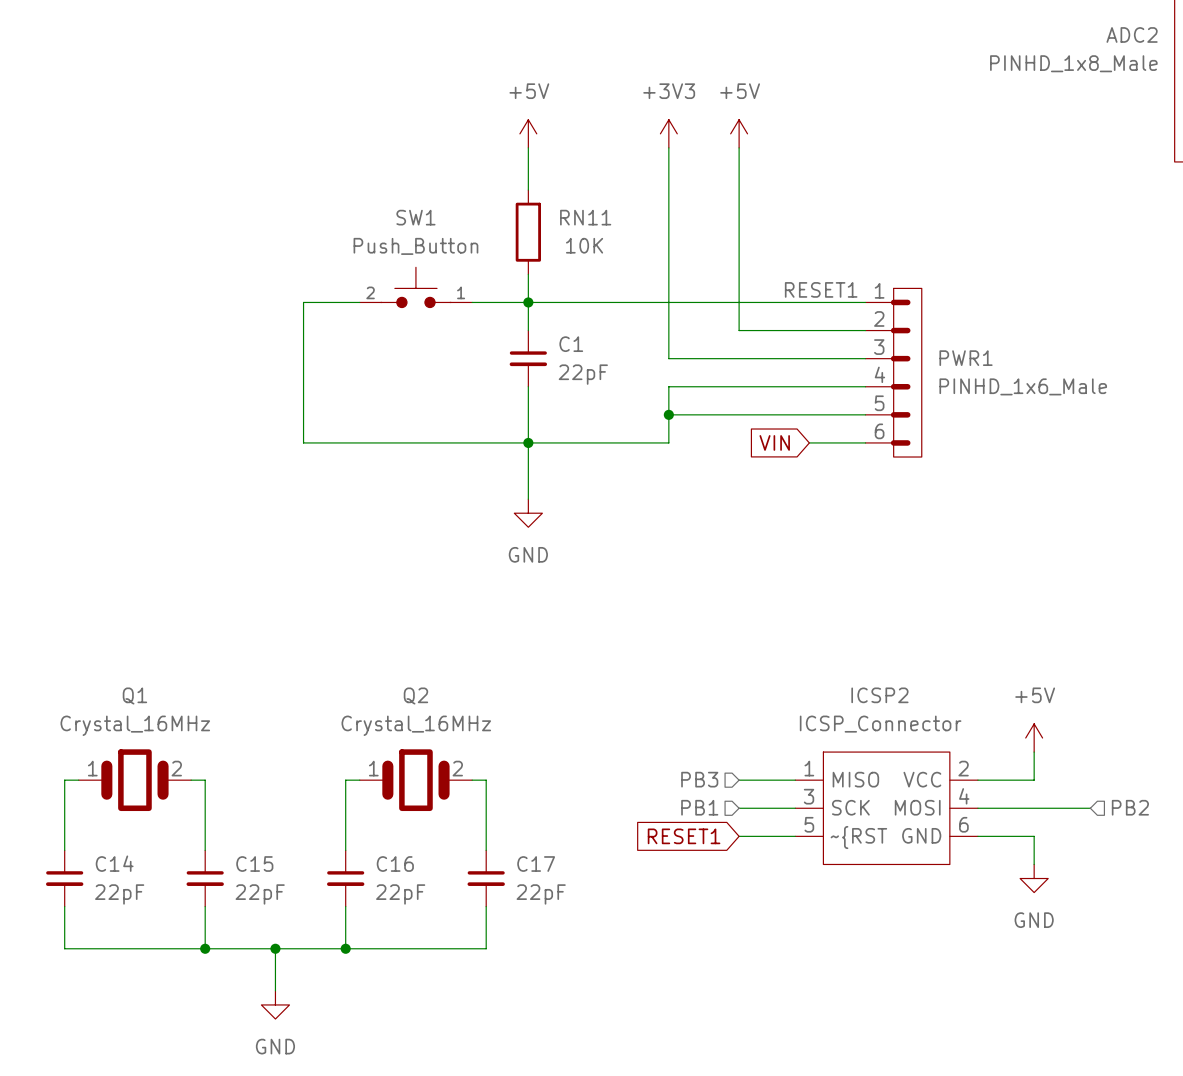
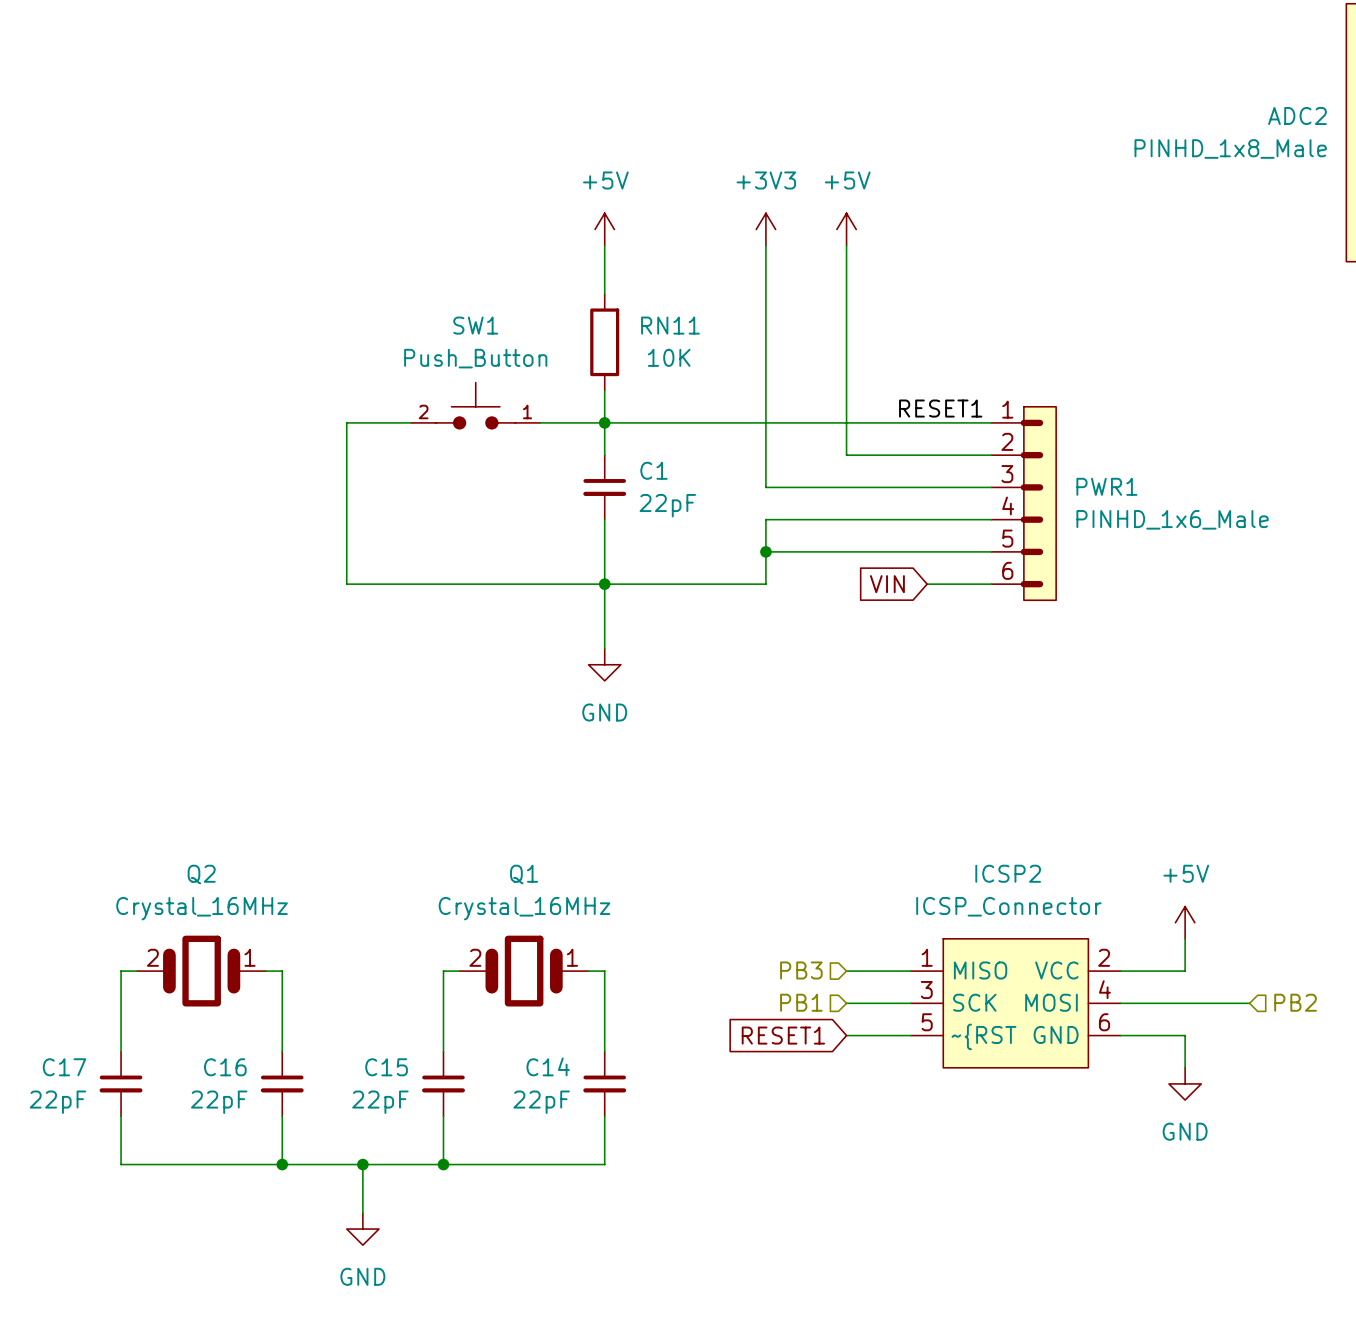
wire: (78, 780) (64, 780) (64, 850) -> (137, 971) (121, 971) (121, 1051)
Q1 rotation: 0° (134, 780) -> 180° (524, 971)
Q1 position: (134, 780) -> (524, 971)
wire: (191, 780) (205, 780) (205, 850) -> (266, 971) (282, 971) (282, 1051)
wire: (359, 780) (345, 780) (345, 850) -> (459, 971) (443, 971) (443, 1051)
Q2 rotation: 0° (415, 780) -> 180° (201, 971)
Q2 position: (415, 780) -> (201, 971)
wire: (472, 780) (486, 780) (486, 850) -> (588, 971) (604, 971) (604, 1051)
C14 name position: C14 (114, 863) -> C14 (548, 1066)
C15 name position: C15 (254, 864) -> C15 (386, 1067)
C16 name position: C16 (395, 864) -> C16 (225, 1067)
C17 name position: C17 (536, 864) -> C17 (64, 1067)
C14 position: (64, 878) -> (604, 1083)
C15 position: (205, 878) -> (443, 1083)
C16 position: (345, 878) -> (282, 1083)
C17 position: (486, 878) -> (121, 1083)
C14 text position: 22pF (119, 894) -> 22pF (541, 1102)
C15 text position: 22pF (260, 894) -> 22pF (380, 1102)
C16 text position: 22pF (400, 894) -> 22pF (219, 1102)
C17 text position: 22pF (541, 894) -> 22pF (57, 1102)
wire: (64, 906) (64, 948) (106, 948) -> (121, 1116) (121, 1164)
wire: (205, 906) (205, 948) -> (282, 1116) (282, 1164)
wire: (345, 906) (345, 948) -> (443, 1116) (443, 1164)
wire: (486, 906) (486, 948) -> (604, 1116) (604, 1164) (556, 1164)
junction: (205, 948) -> none
junction: none -> (282, 1164)
wire: (275, 948) (275, 990) -> (362, 1164) (362, 1212)
junction: (275, 948) -> none
junction: none -> (362, 1164)
junction: (345, 948) -> none
junction: none -> (443, 1164)
power symbol position: GND (275, 1004) -> GND (362, 1229)

